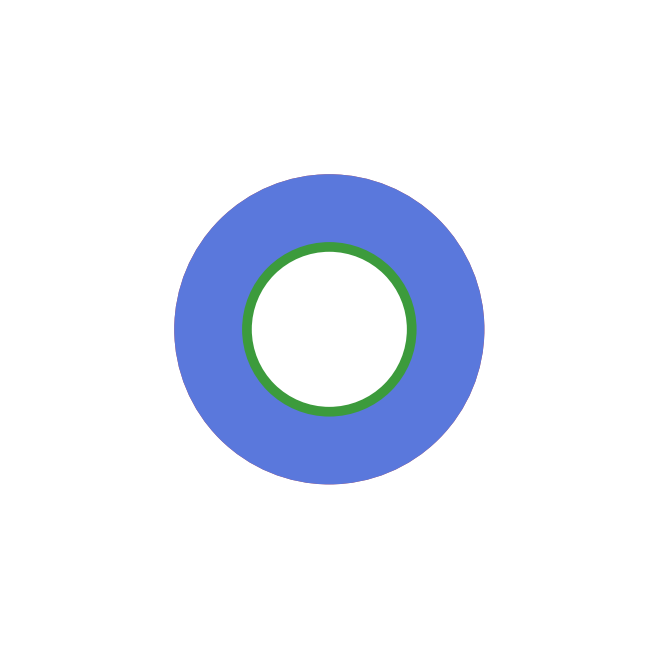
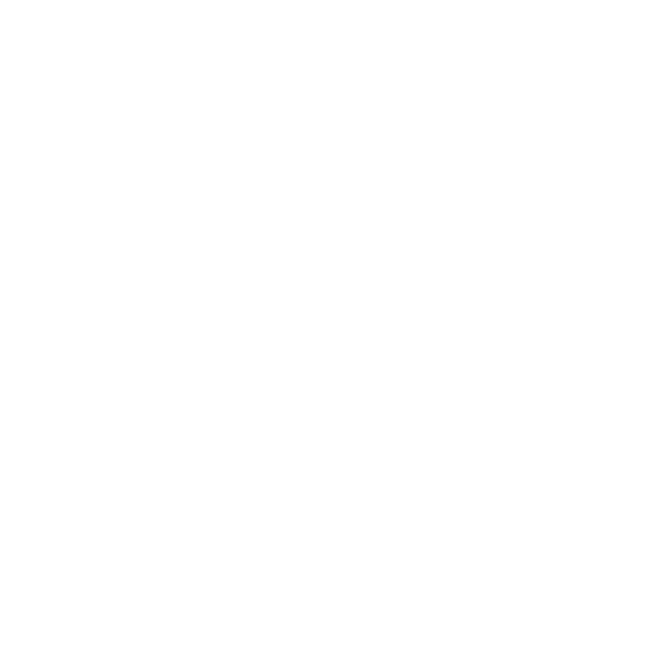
part: (329, 329) -> none

